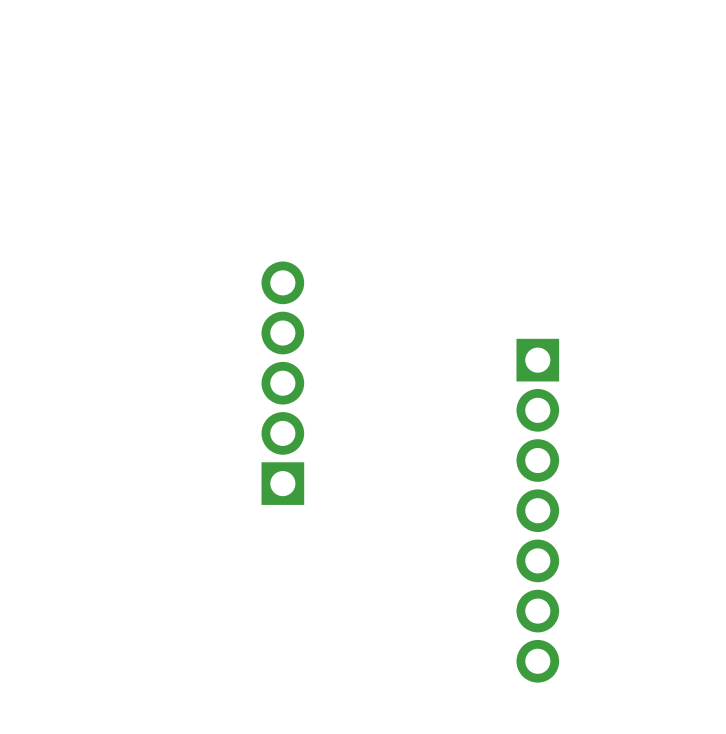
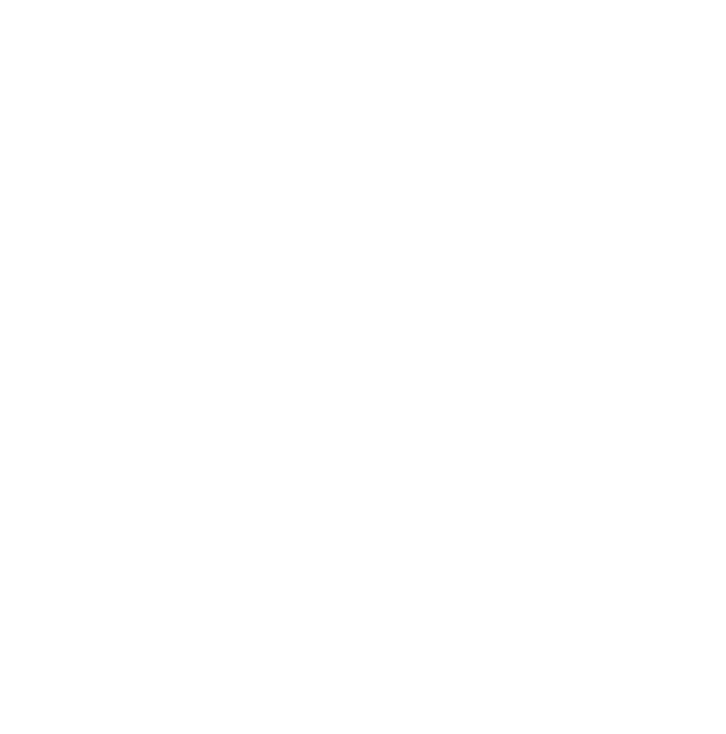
part: (282, 383) -> none
part: (537, 510) -> none

